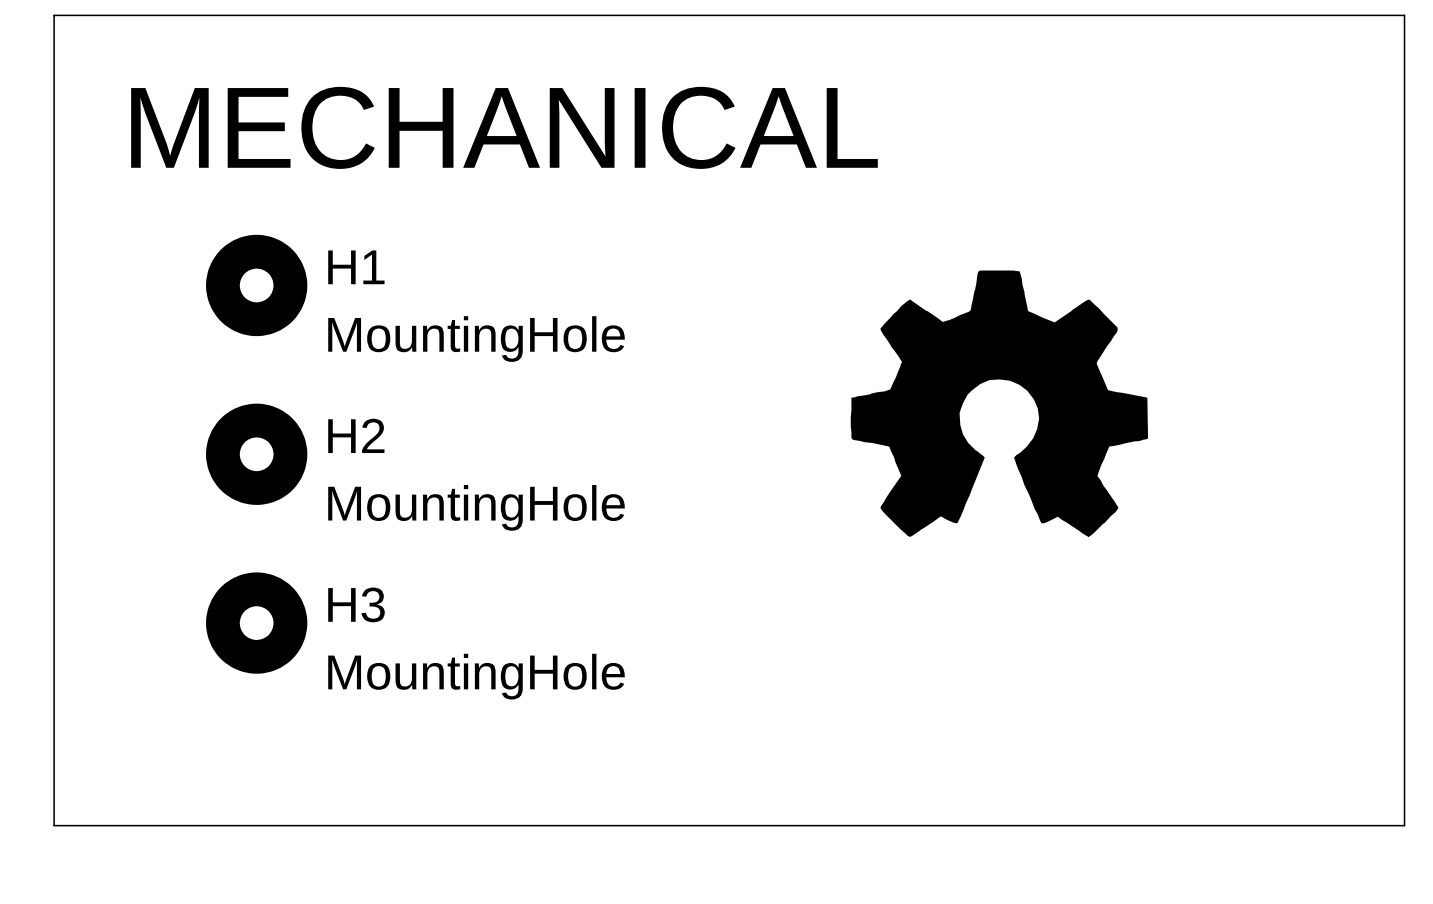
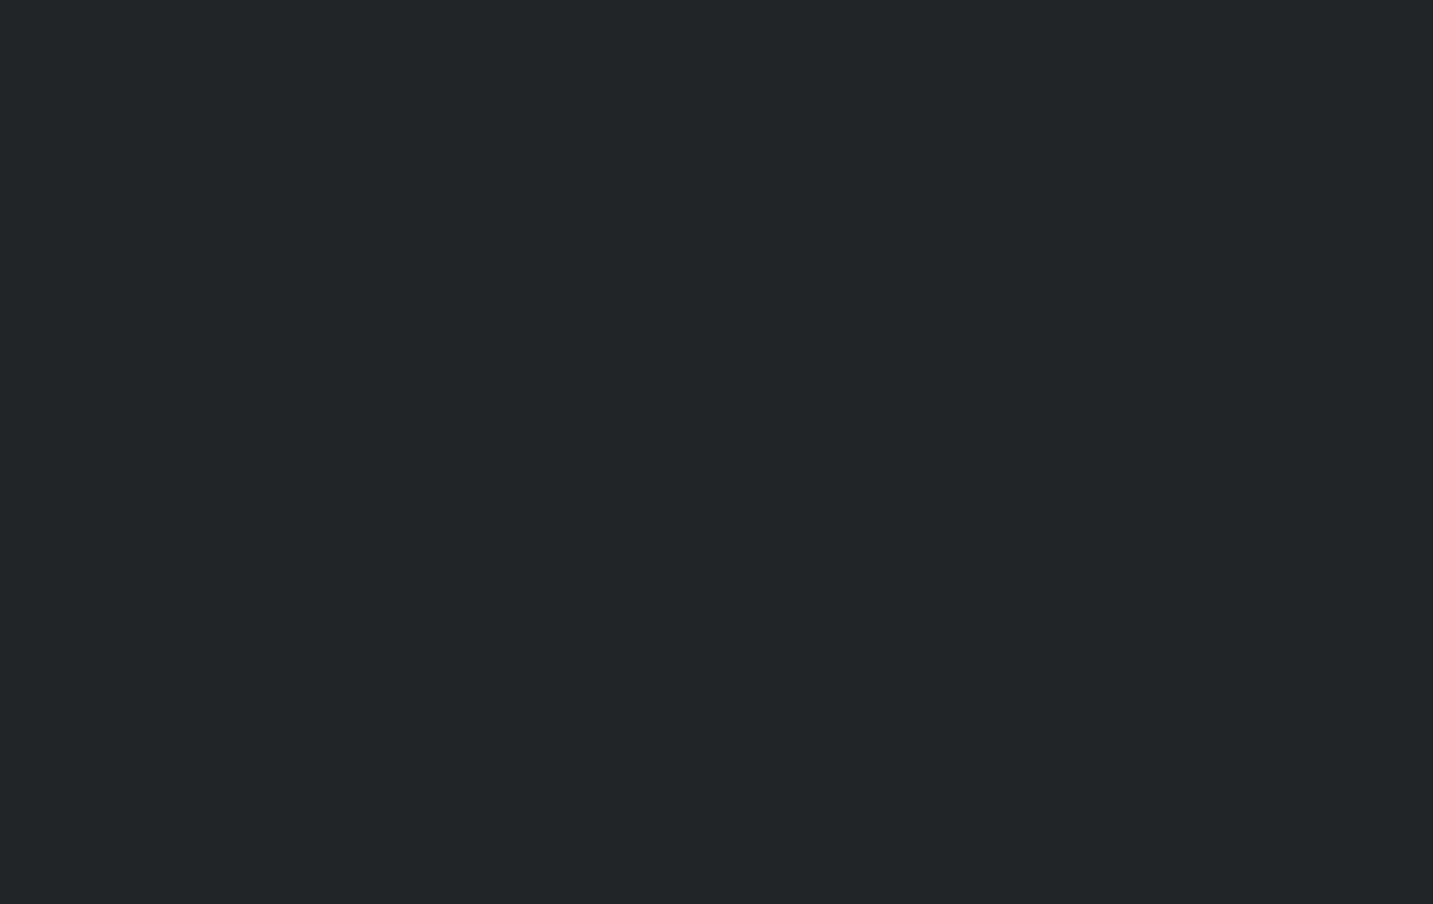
line: (54, 15) (54, 825) (1404, 825) (1404, 15) (54, 15) -> none
text: MECHANICAL (504, 127) -> none
H1: MountingHole (256, 285) -> none
part: (999, 403) -> none
H2: MountingHole (256, 454) -> none
H3: MountingHole (256, 623) -> none

